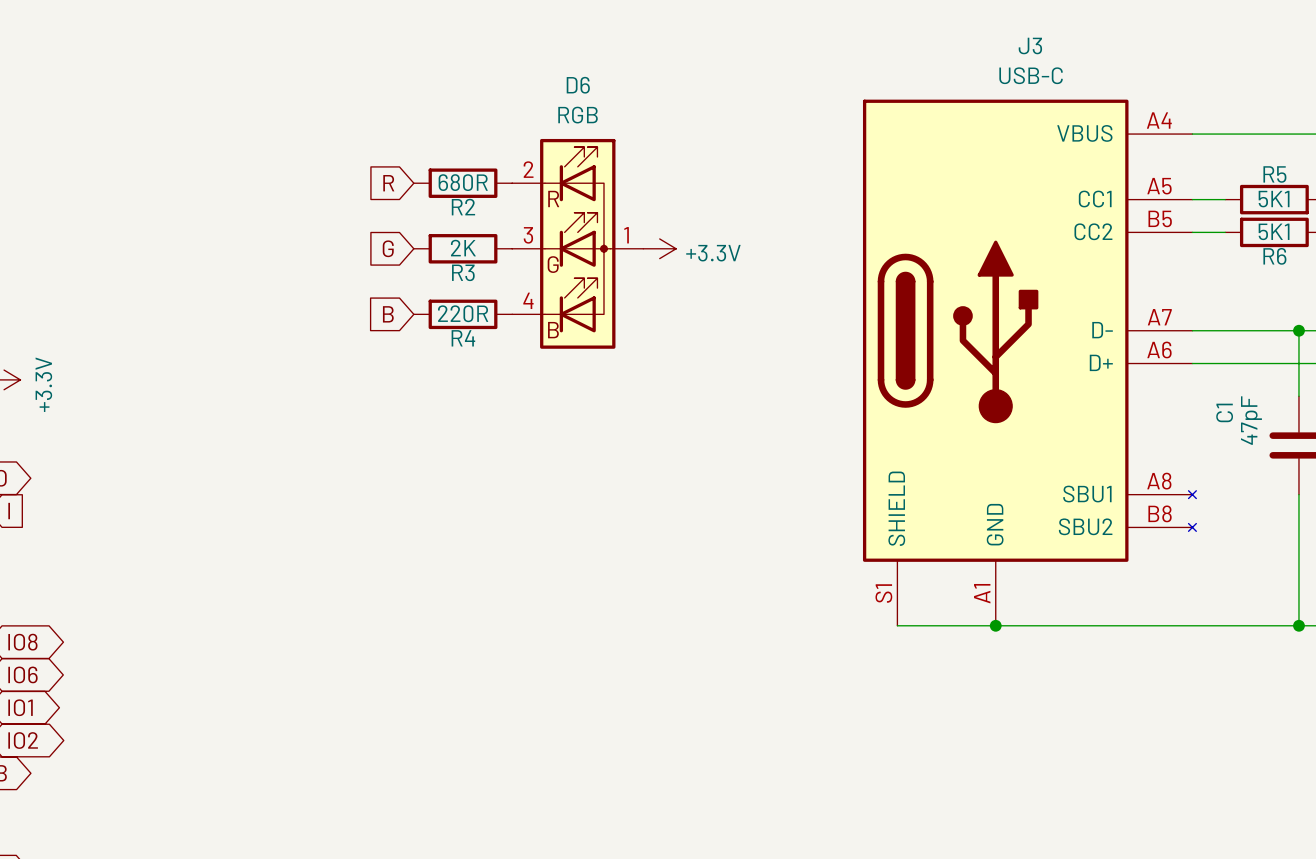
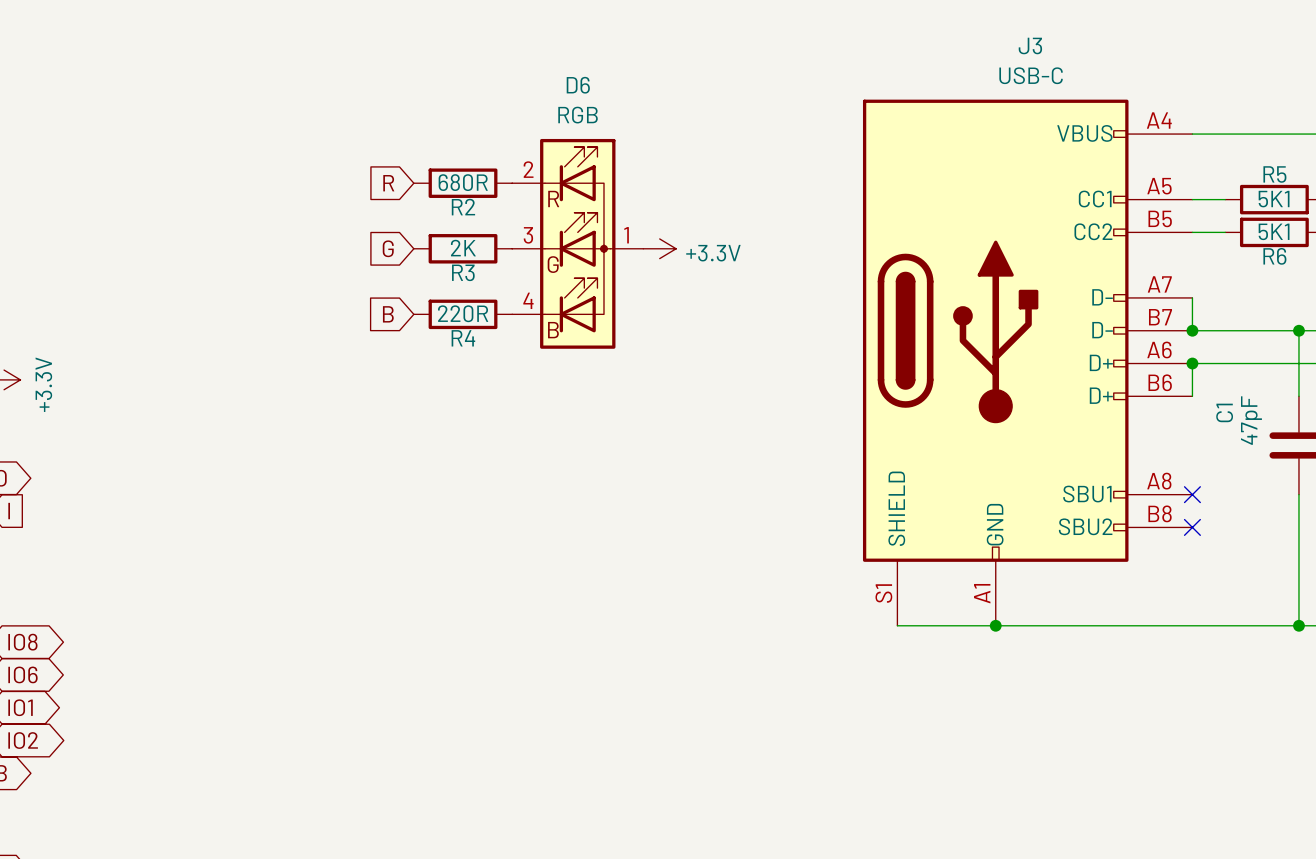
J3 symbol: [862, 99, 1197, 626] -> [862, 99, 1193, 626]
wire: none -> (1192, 297) (1192, 330)
junction: none -> (1192, 330)
wire: none -> (1192, 363) (1192, 396)
junction: none -> (1192, 363)
no-connect mark: none -> (1192, 494)
no-connect mark: none -> (1192, 527)

